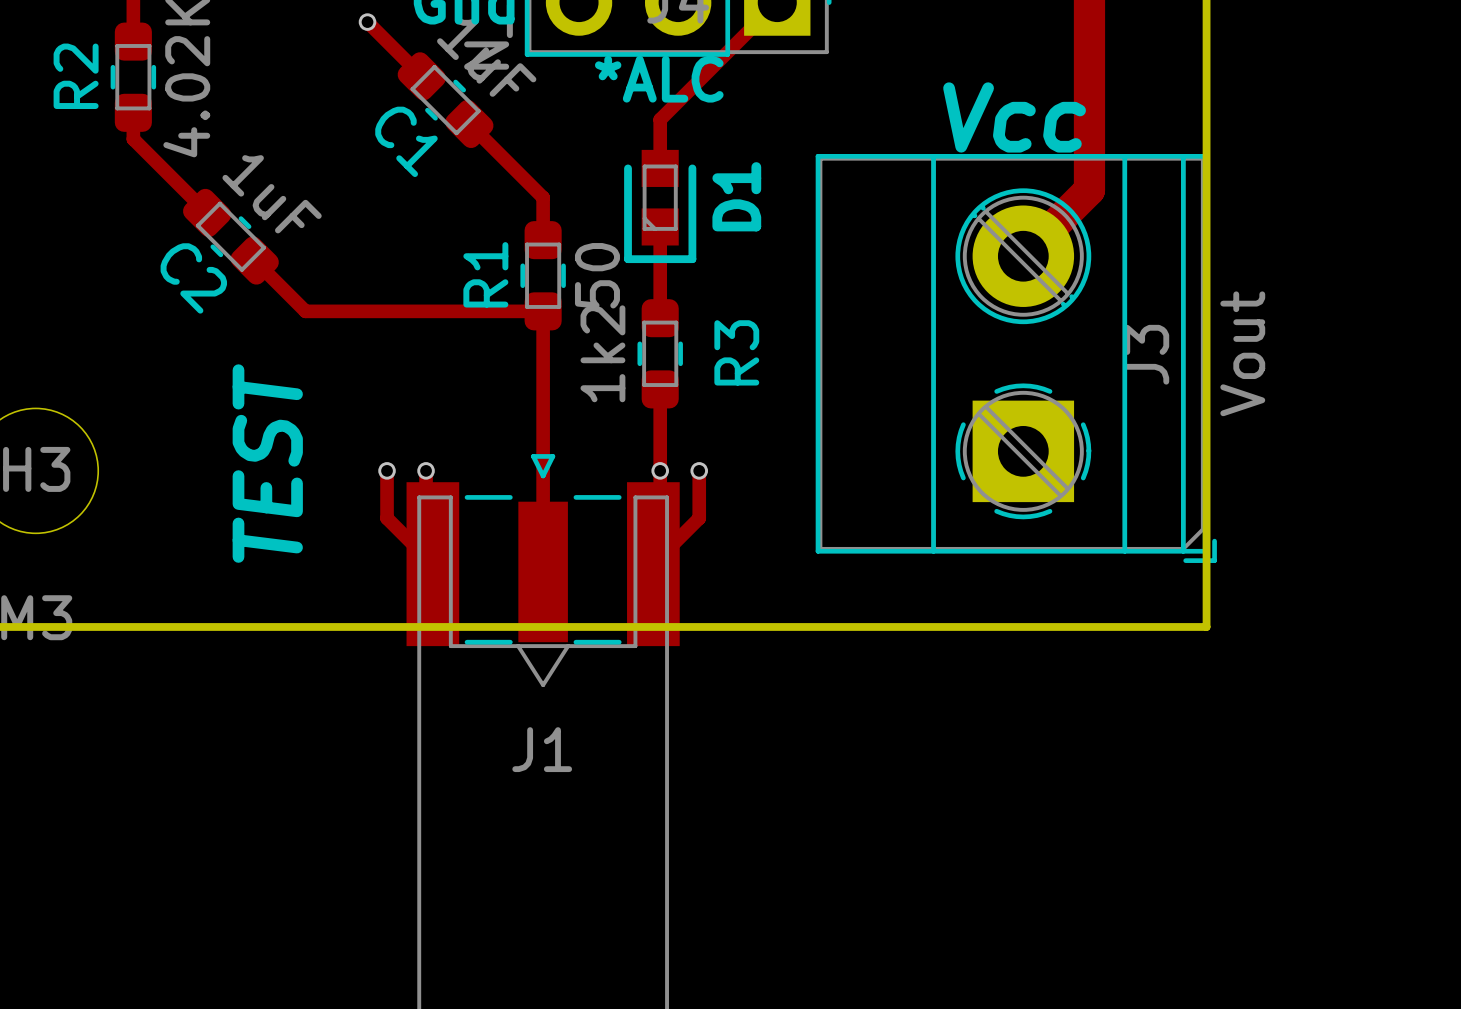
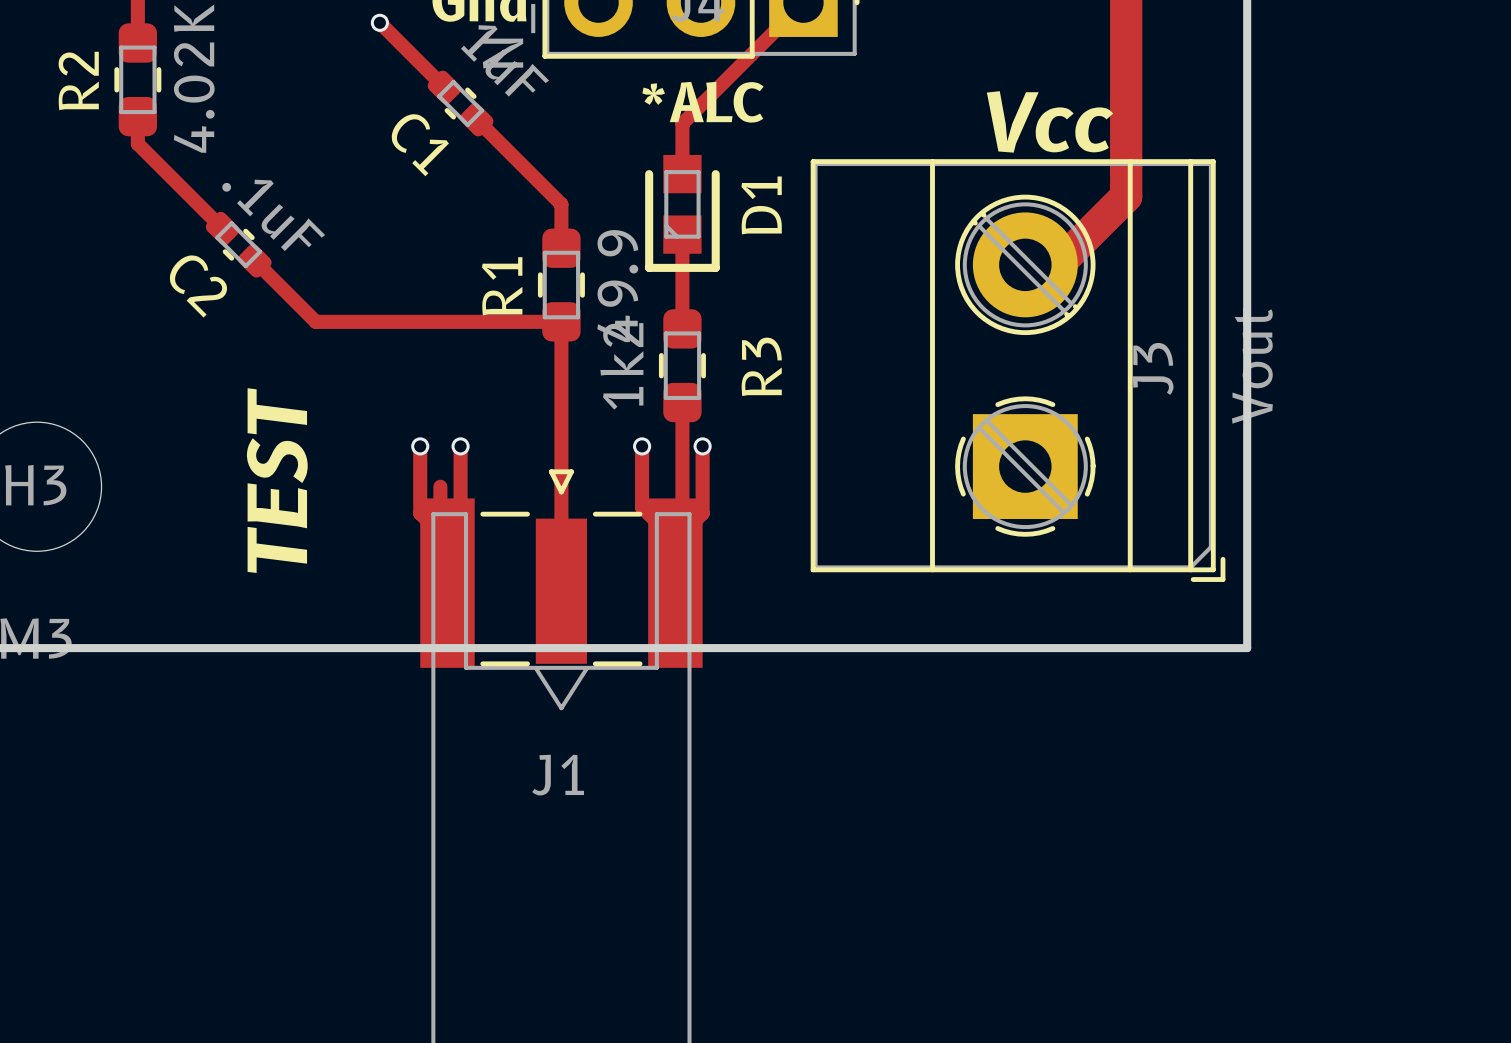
C1 footprint: [397, 52, 494, 149] -> [427, 70, 494, 137]
text position: *ALC (659, 79) -> *ALC (703, 102)
C2 footprint: [183, 188, 279, 285] -> [205, 211, 272, 278]
C2 value: 1uF (272, 194) -> .1uF (273, 215)
R1 value: 50 (597, 275) -> 49.9 (617, 286)
J3 position: (1016, 358) -> (1018, 370)
track: none -> (420, 446) (420, 513) (447, 540) (460, 527) (460, 446)
via: none -> (420, 446)
via: none -> (460, 446)
track: none -> (642, 446) (642, 507) (675, 540) (702, 513) (702, 446)
via: none -> (642, 446)
via: none -> (702, 446)
track: (387, 470) (387, 518) (432, 564) -> none
via: (387, 470) -> none
via: (426, 470) -> none
via: (660, 470) -> none
track: (699, 470) (699, 518) (653, 564) -> none
via: (699, 470) -> none

